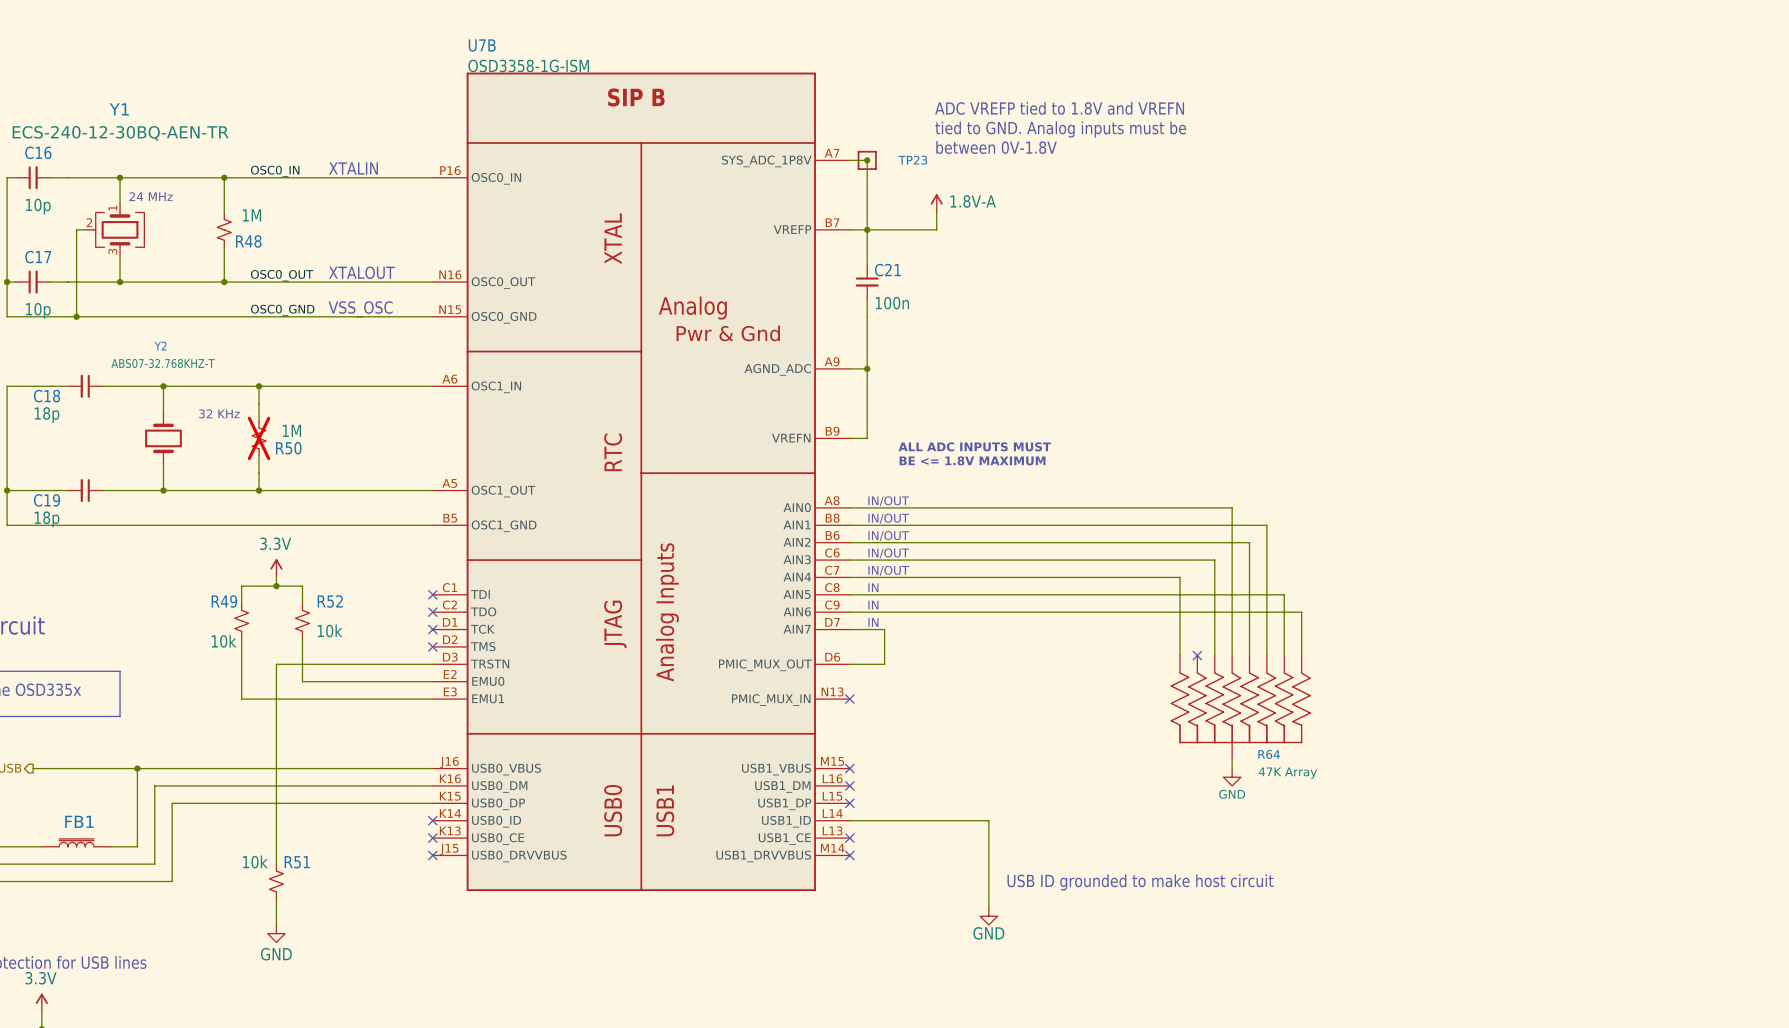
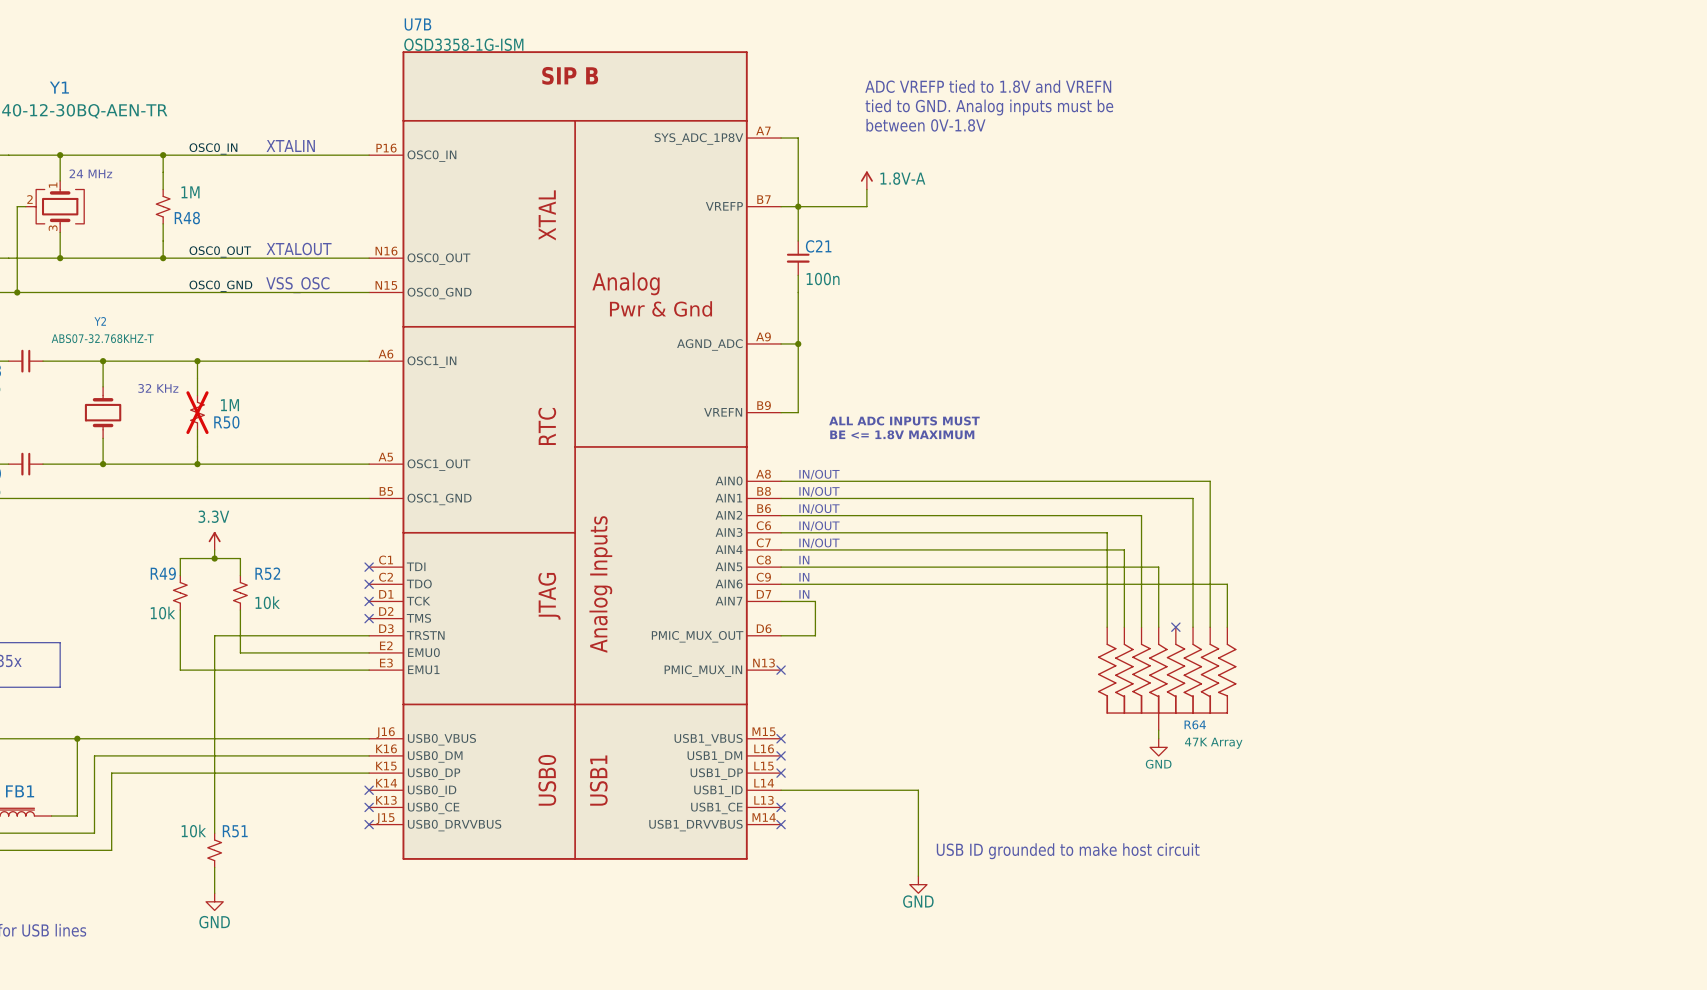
junction: (867, 160) -> none
TP23: (867, 160) -> none
wire: (1232, 507) (1232, 594) (1284, 594) -> (1158, 481) (1210, 481) (1210, 567)
wire: (1214, 542) (1249, 542) (1249, 655) -> none
wire: (1180, 560) (1214, 560) -> (1141, 515) (1141, 532)
wire: none -> (1107, 532) (1107, 549) (1124, 549) (1124, 627)
no-connect mark: (1197, 655) -> none
no-connect mark: none -> (1175, 627)

